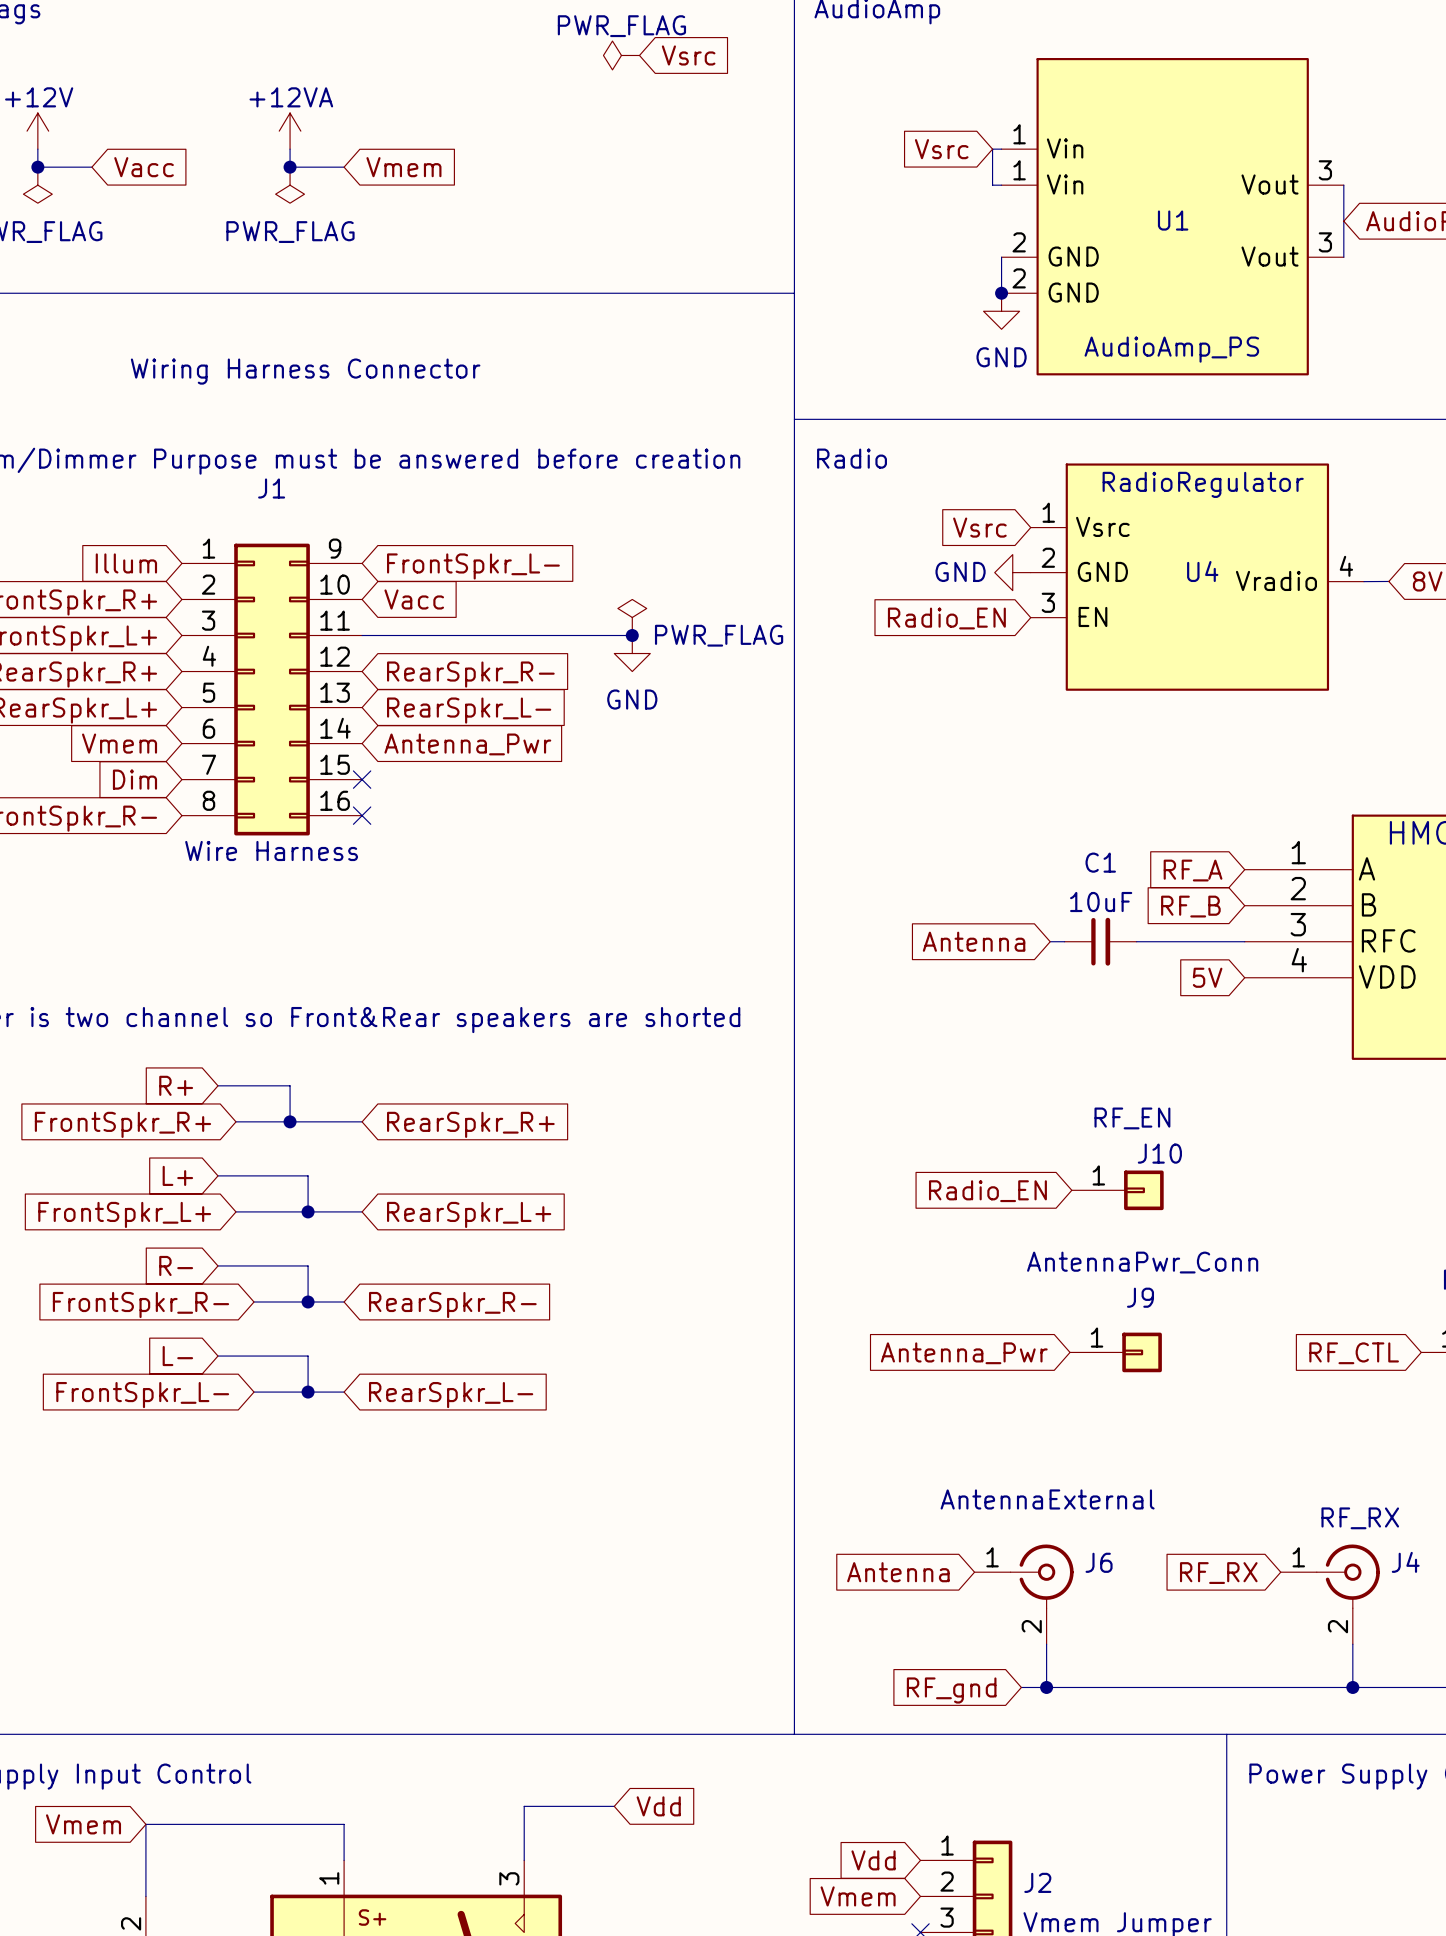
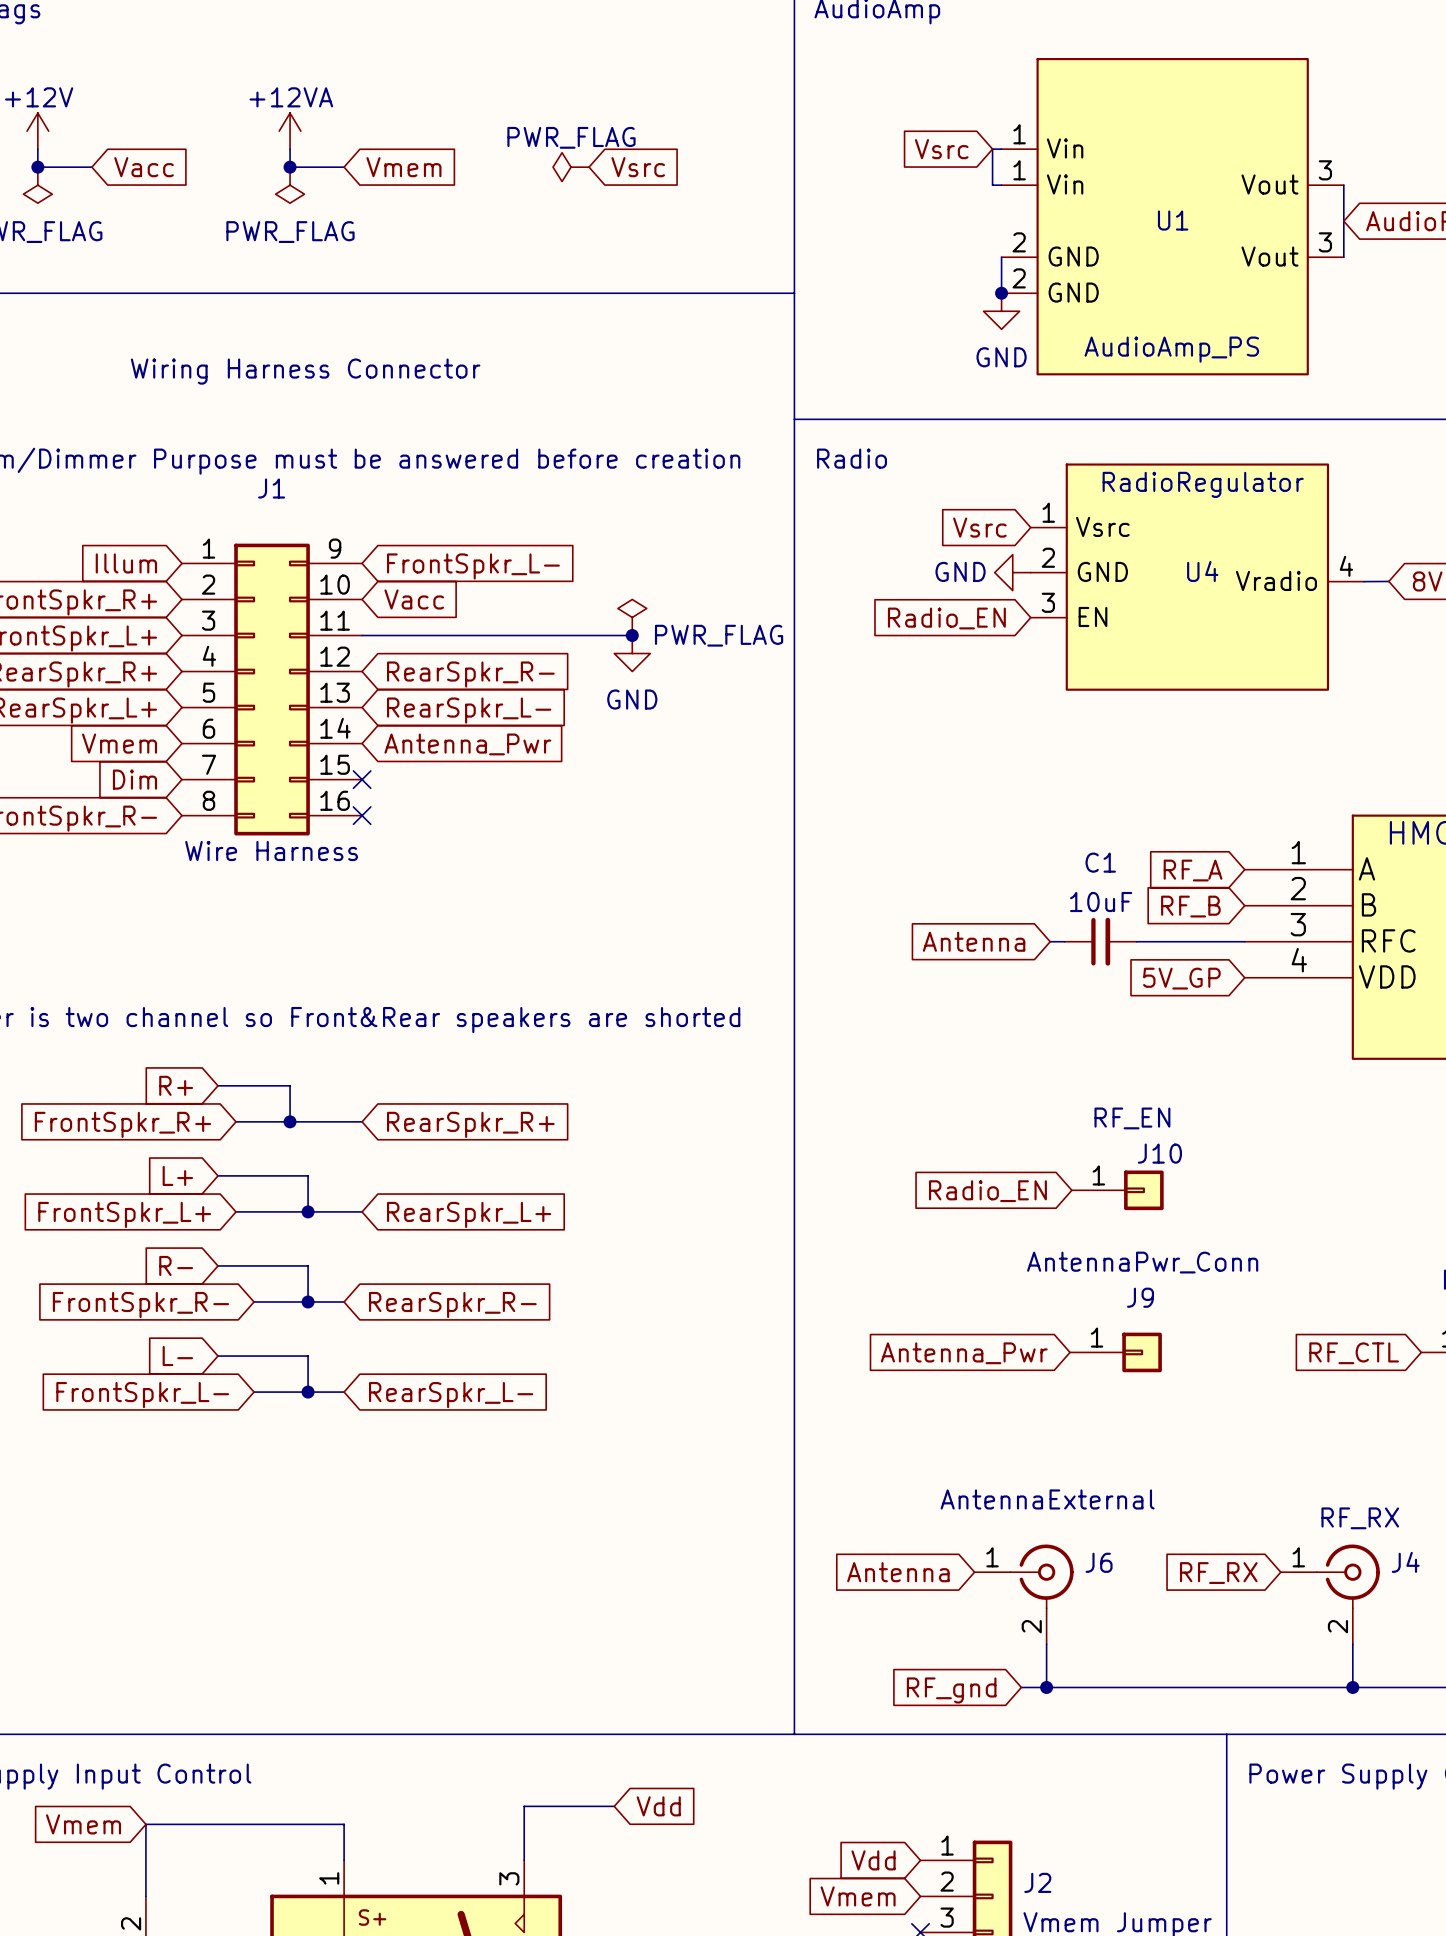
power symbol position: PWR_FLAG (621, 55) -> PWR_FLAG (571, 167)
global label position: Vsrc (688, 55) -> Vsrc (638, 167)
global label: 5V (1207, 977) -> 5V_GP (1181, 978)

